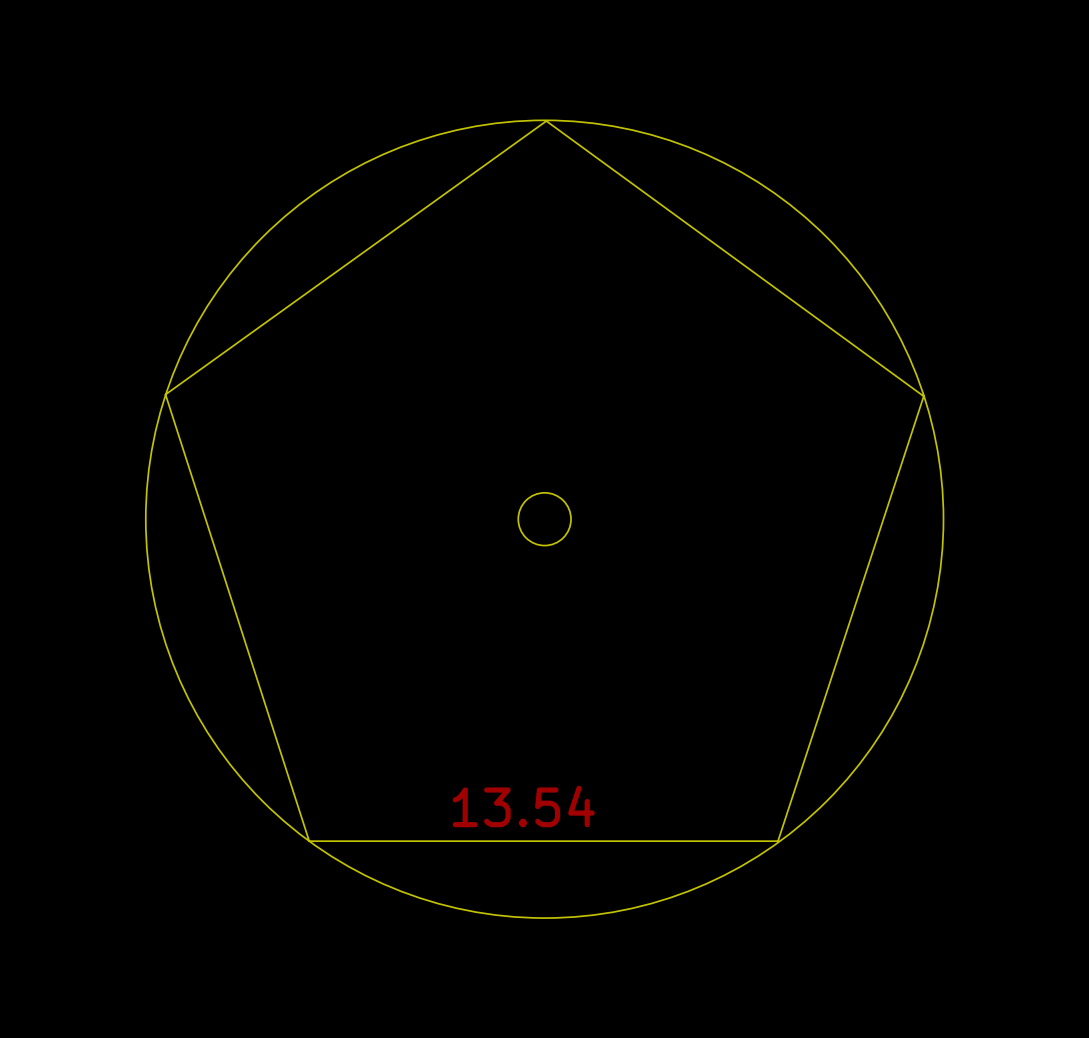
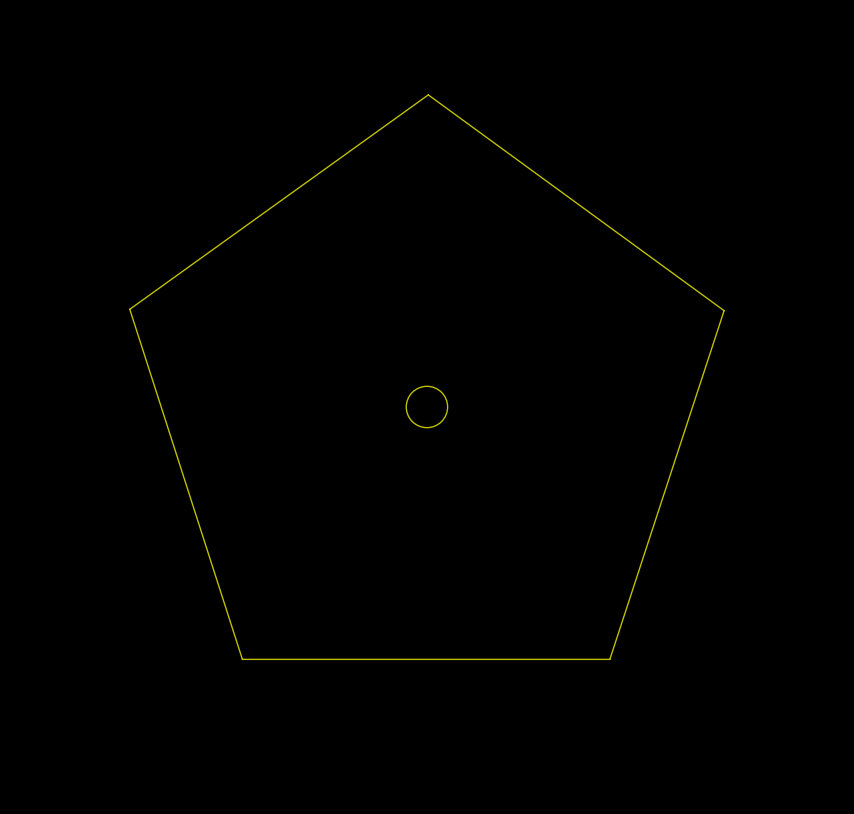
round board edge: [144, 119, 945, 919] -> none
text: 13.54 (523, 806) -> none

